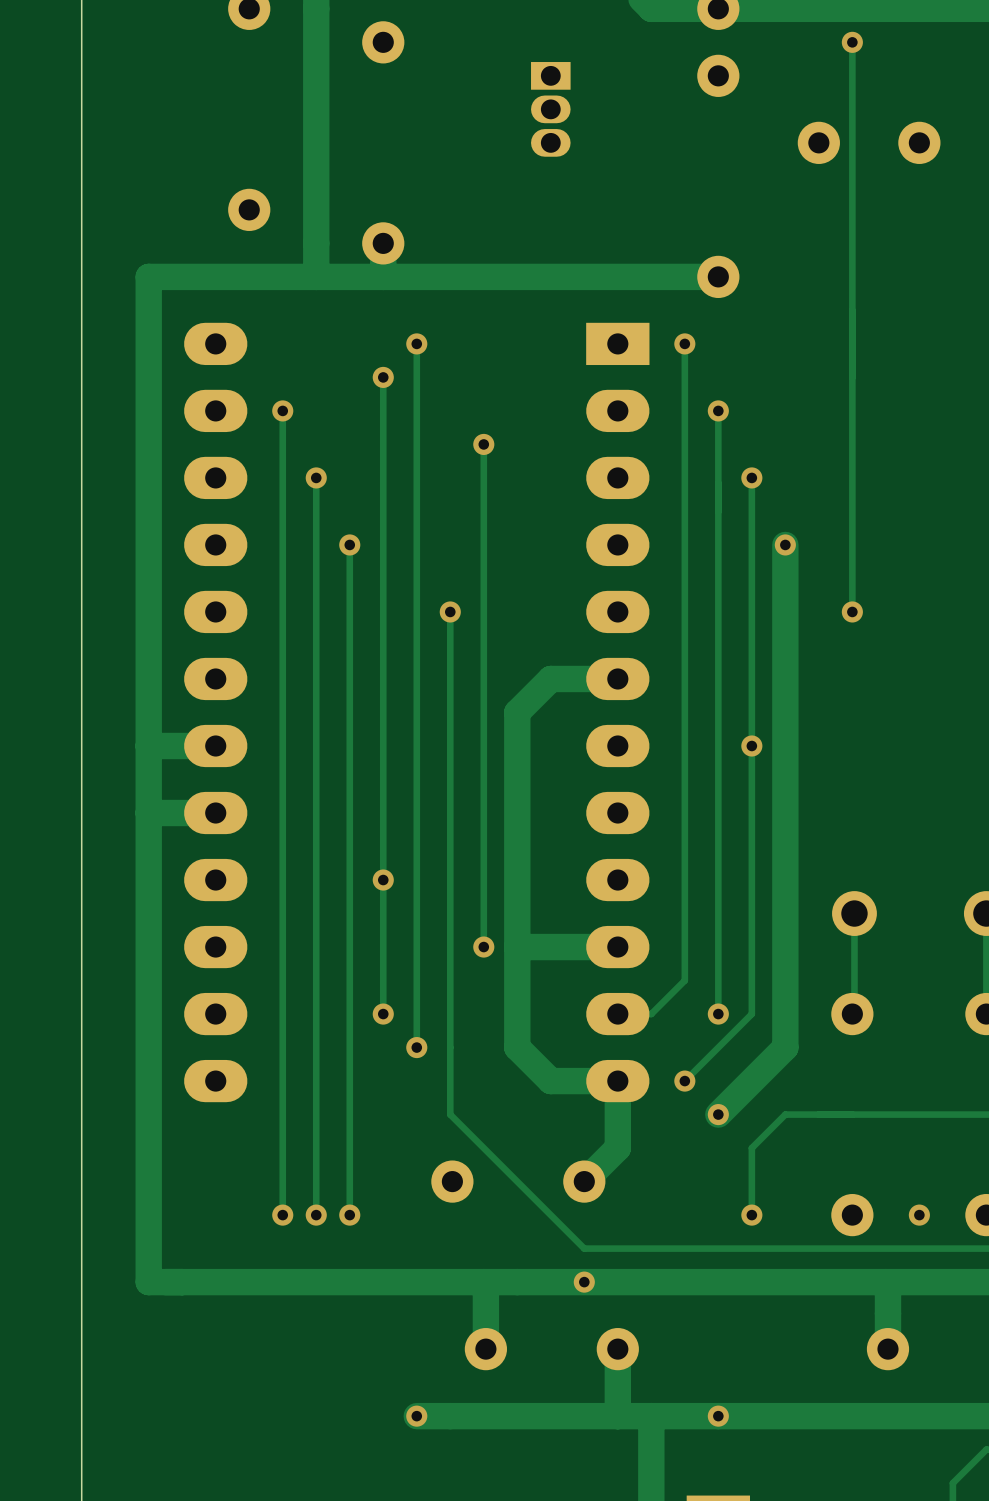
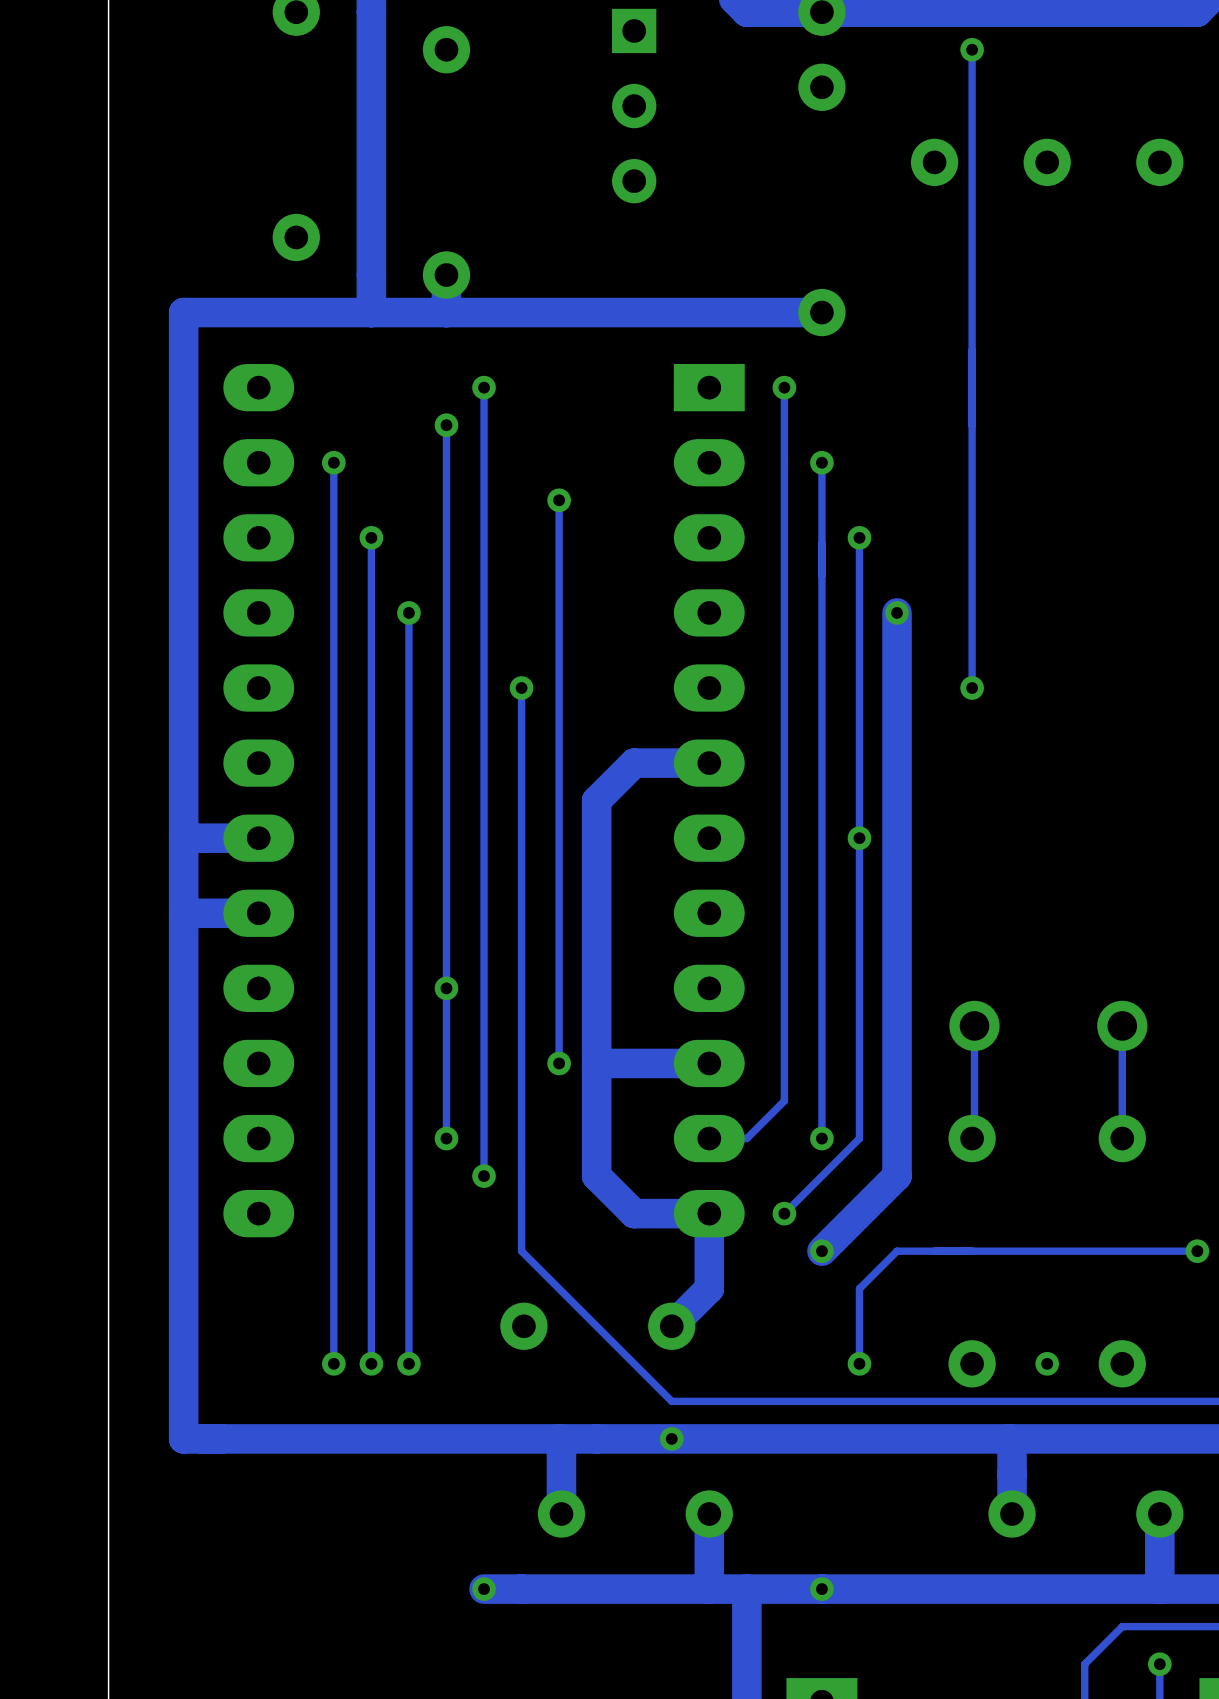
part footprint: [531, 62, 571, 157] -> [612, 8, 657, 204]

